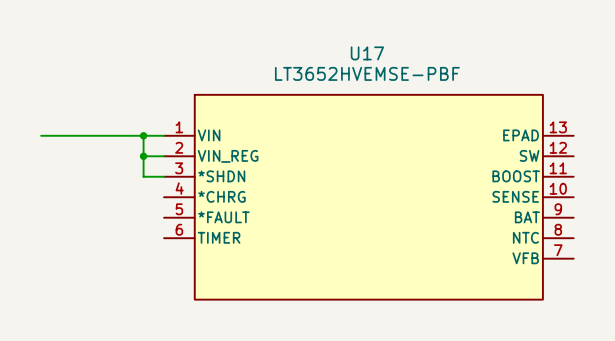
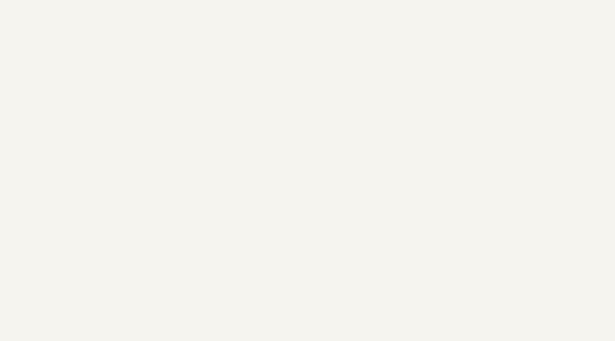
wire: (41, 135) (164, 135) -> none
wire: (143, 135) (143, 176) (164, 176) -> none
junction: (143, 135) -> none
wire: (143, 156) (164, 156) -> none
junction: (143, 156) -> none
U17: LT3652HVEMSE-PBF (368, 197) -> none

